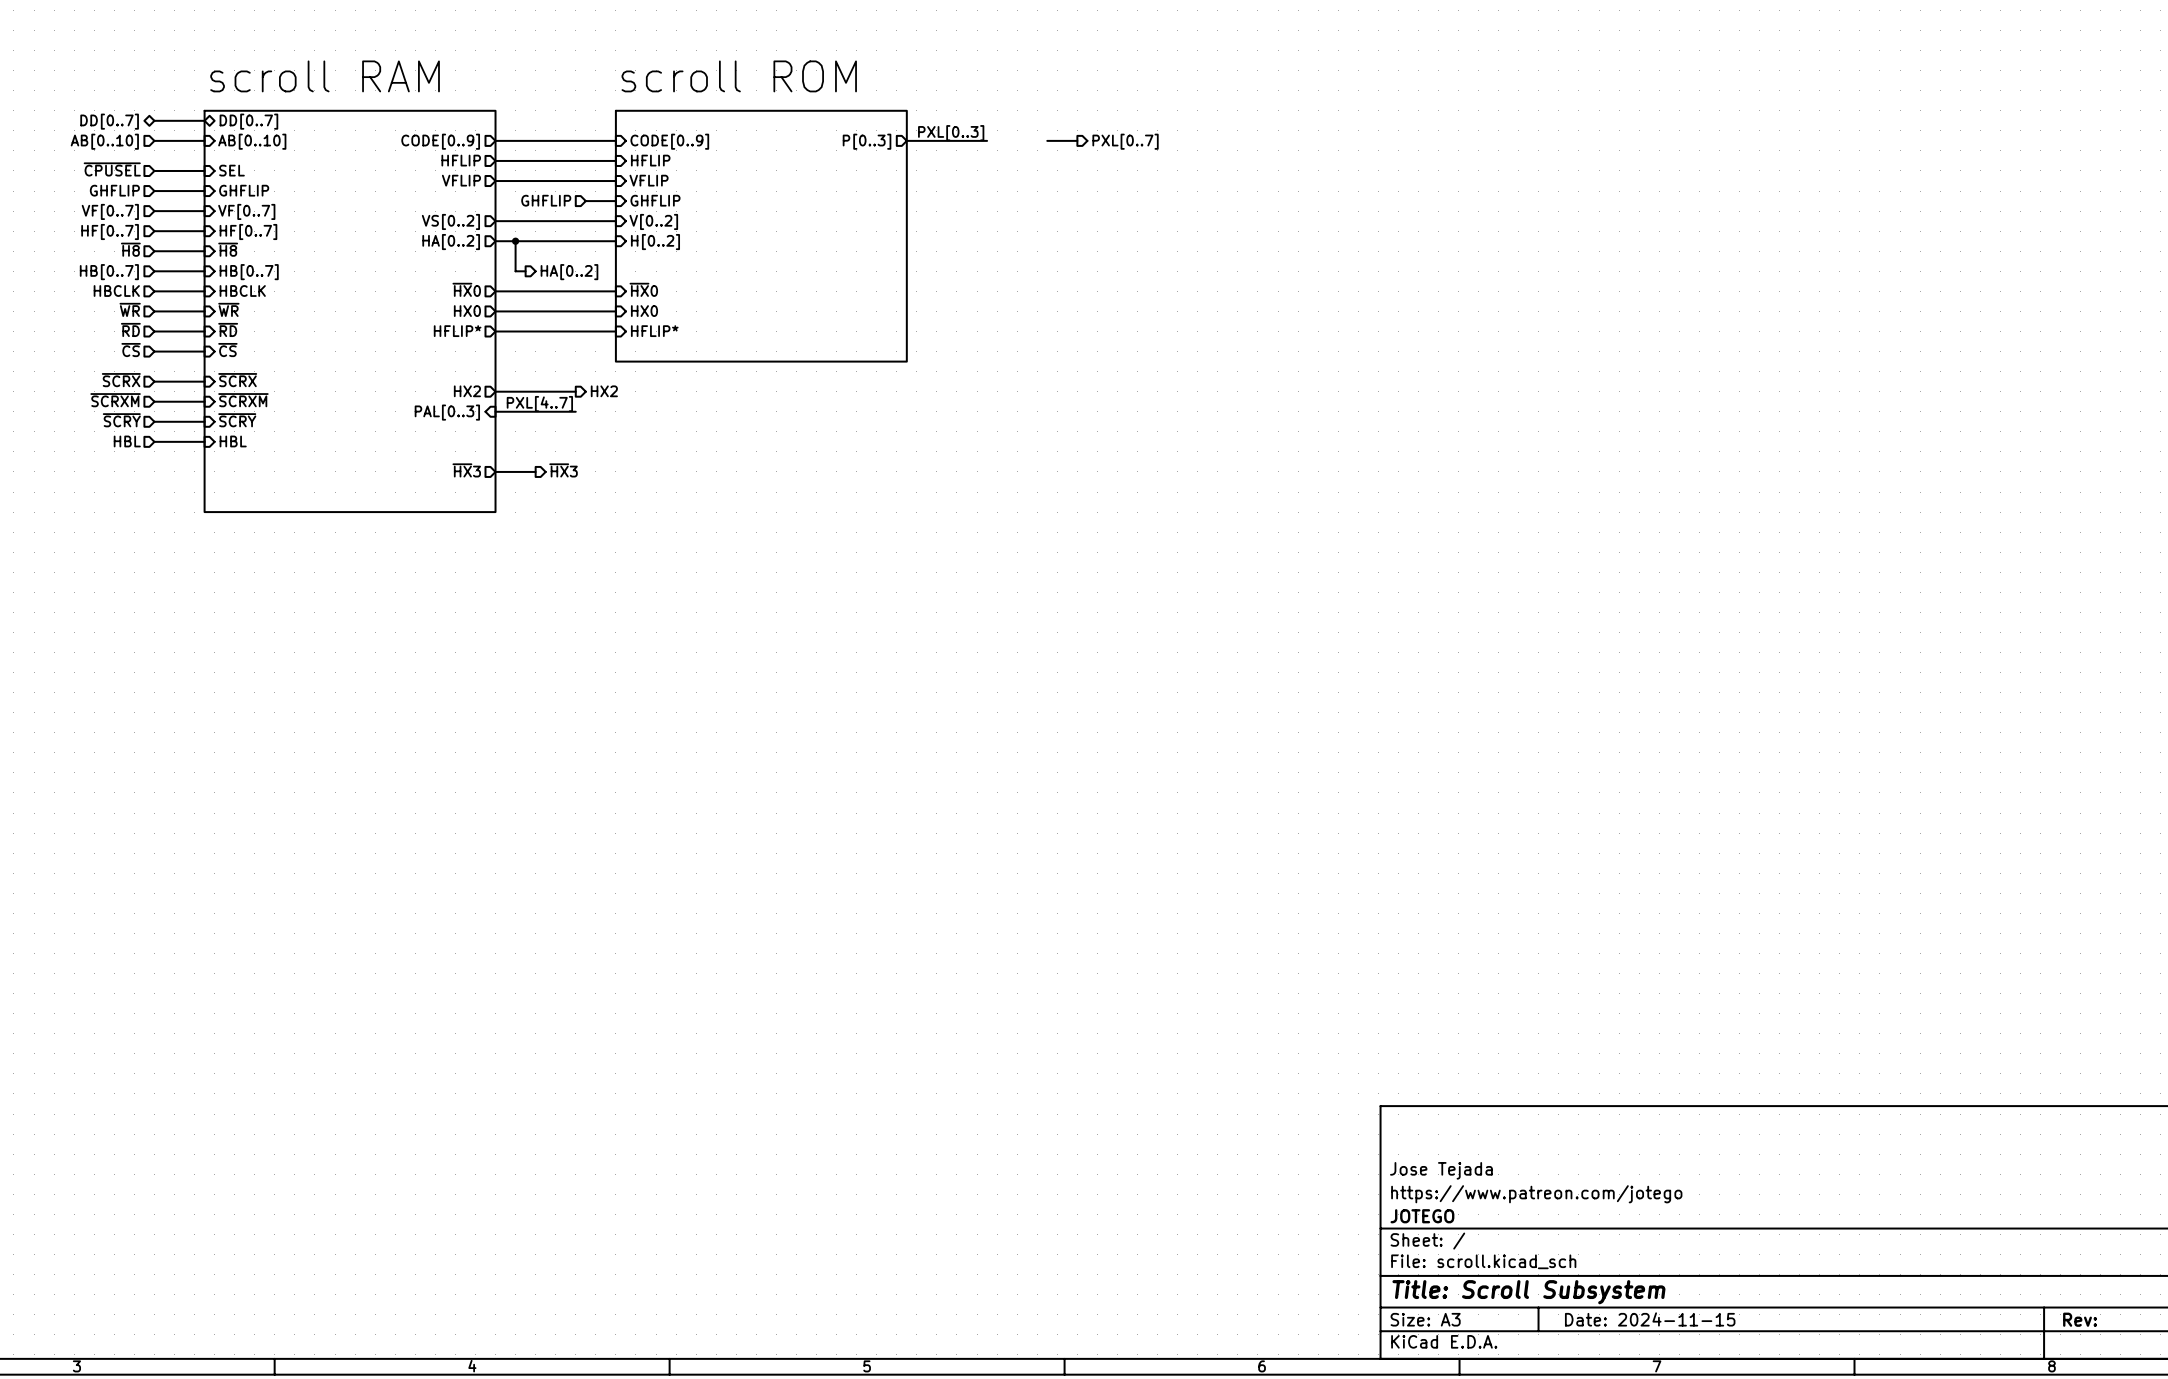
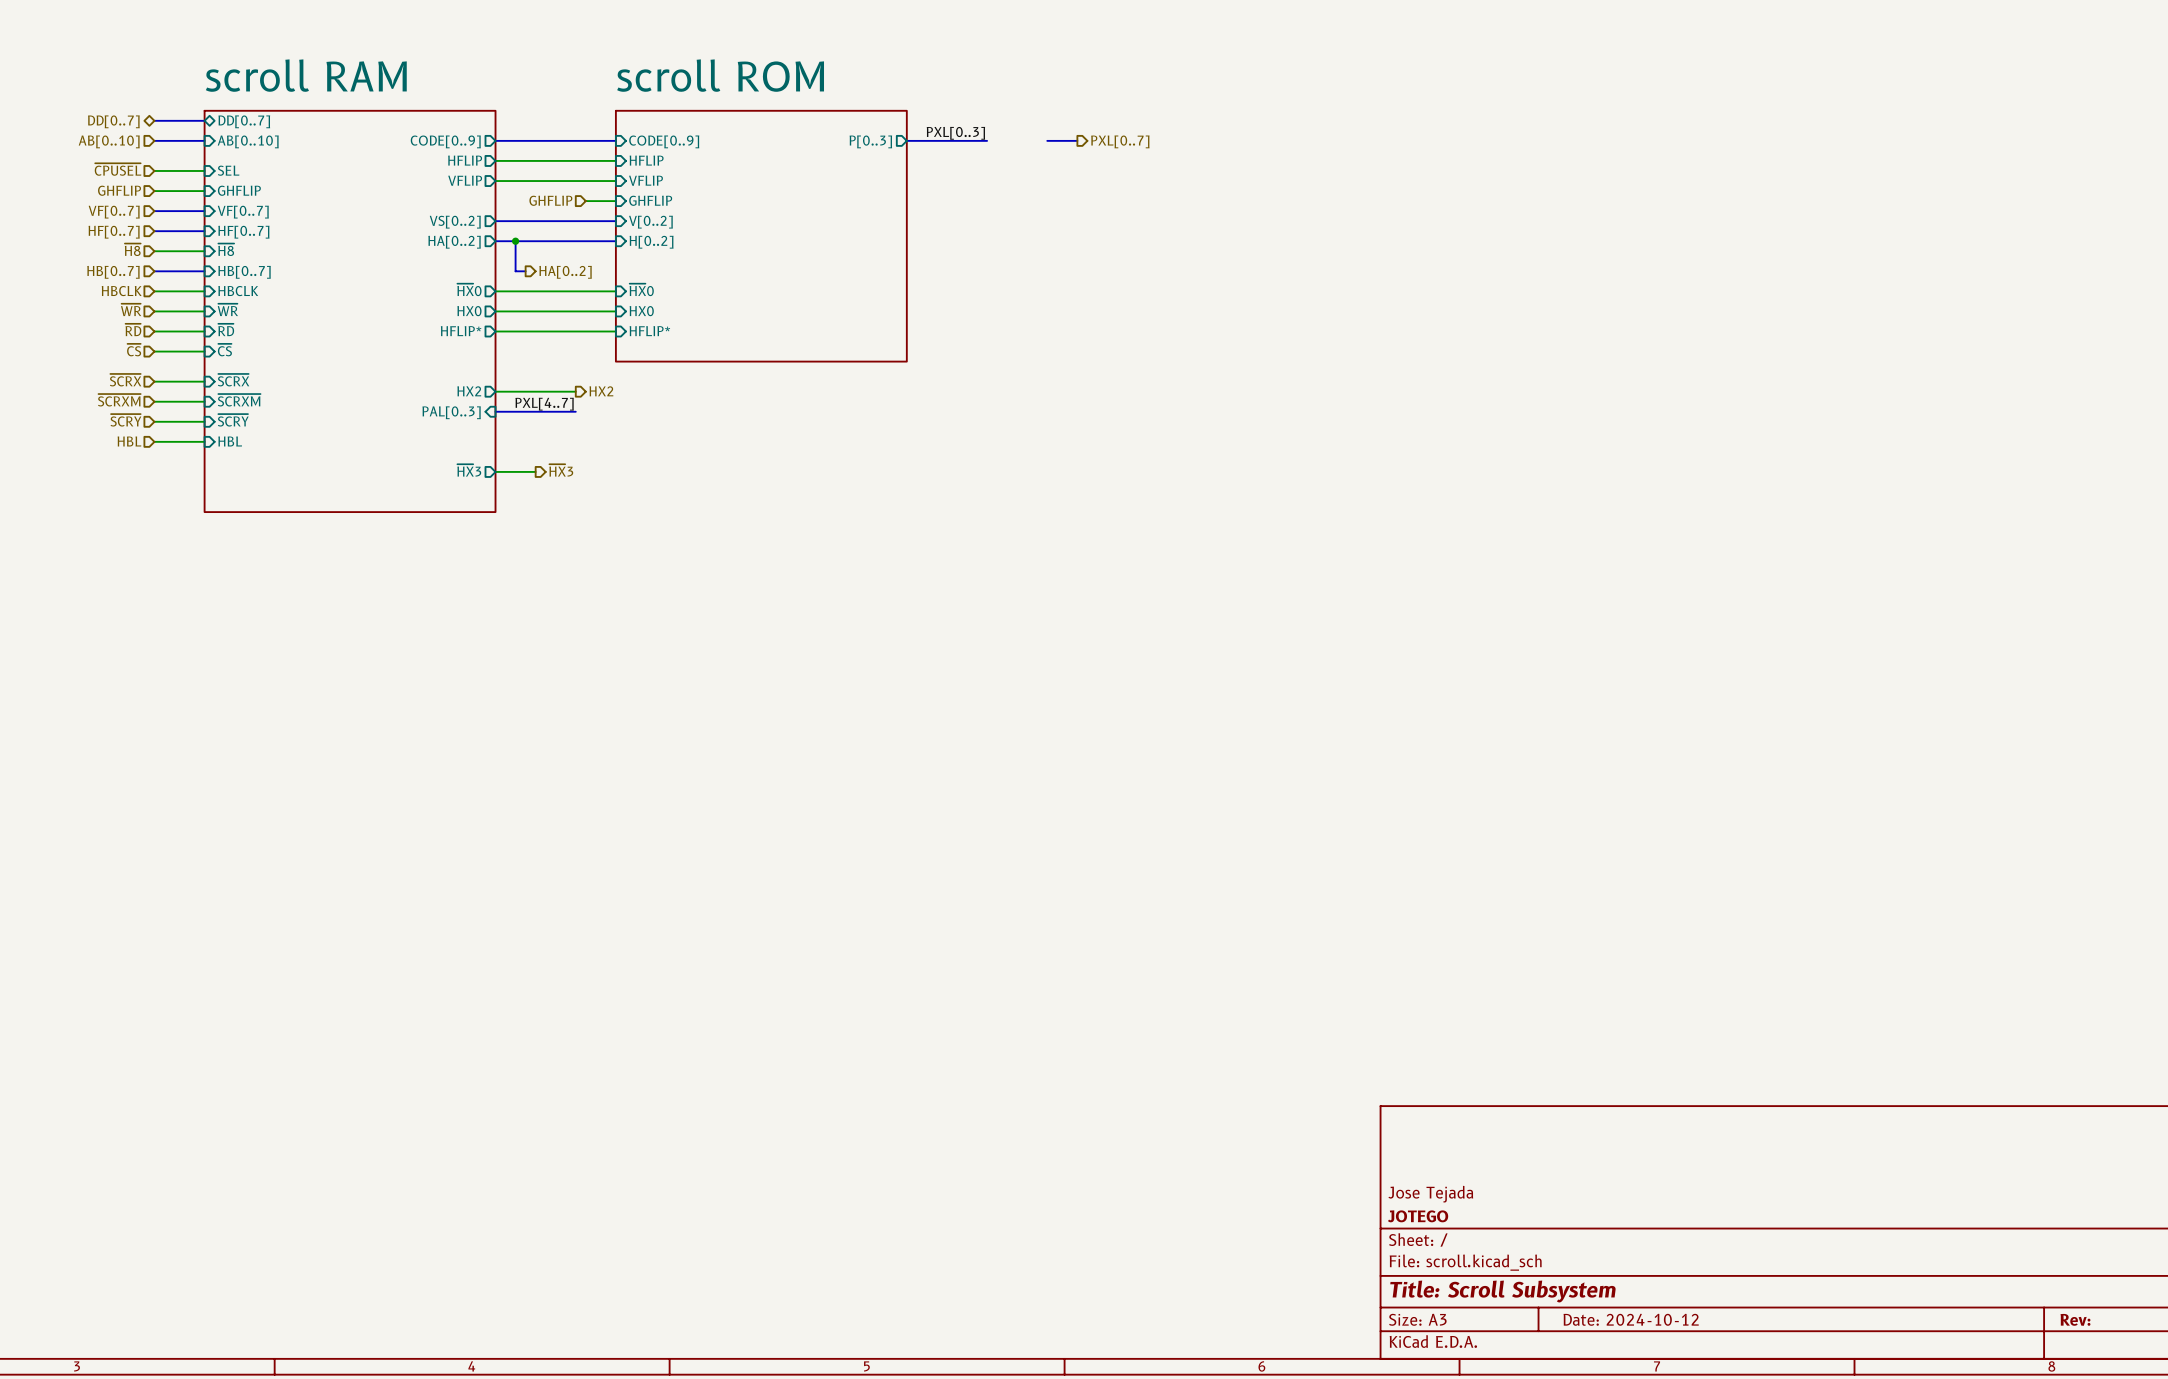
title block: Jose Tejada (1441, 1170) -> none
title block: https://www.patreon.com/jotego (1536, 1194) -> Jose Tejada (1430, 1194)
title block: Date: 2024-11-15 (1650, 1319) -> Date: 2024-10-12 (1631, 1319)

